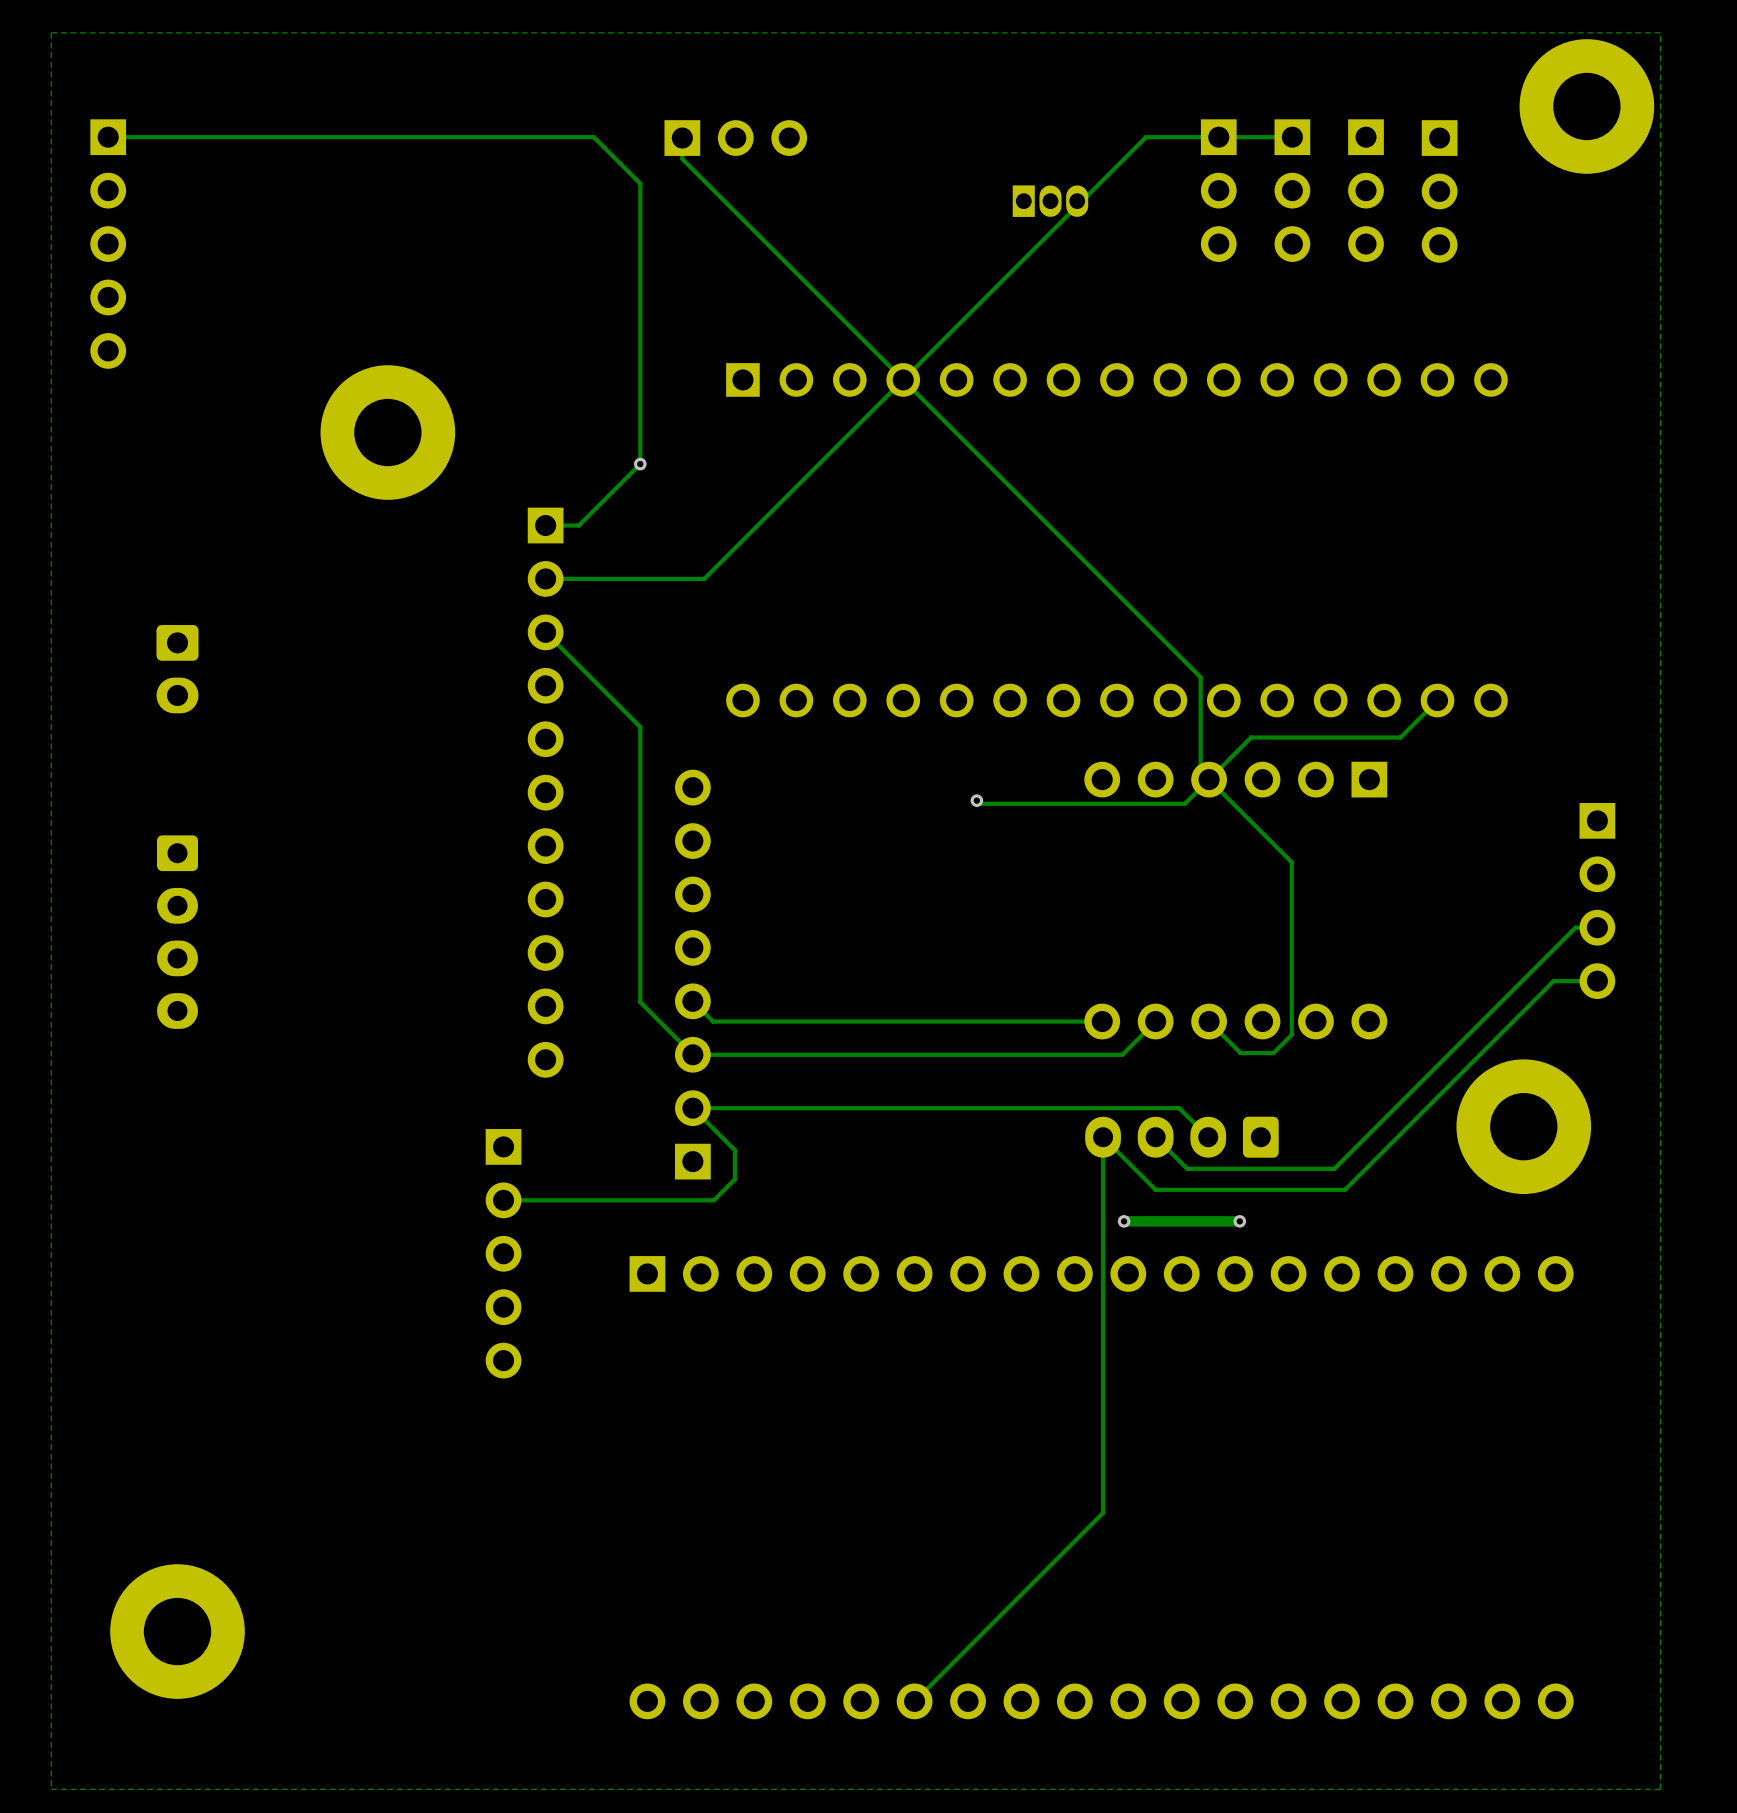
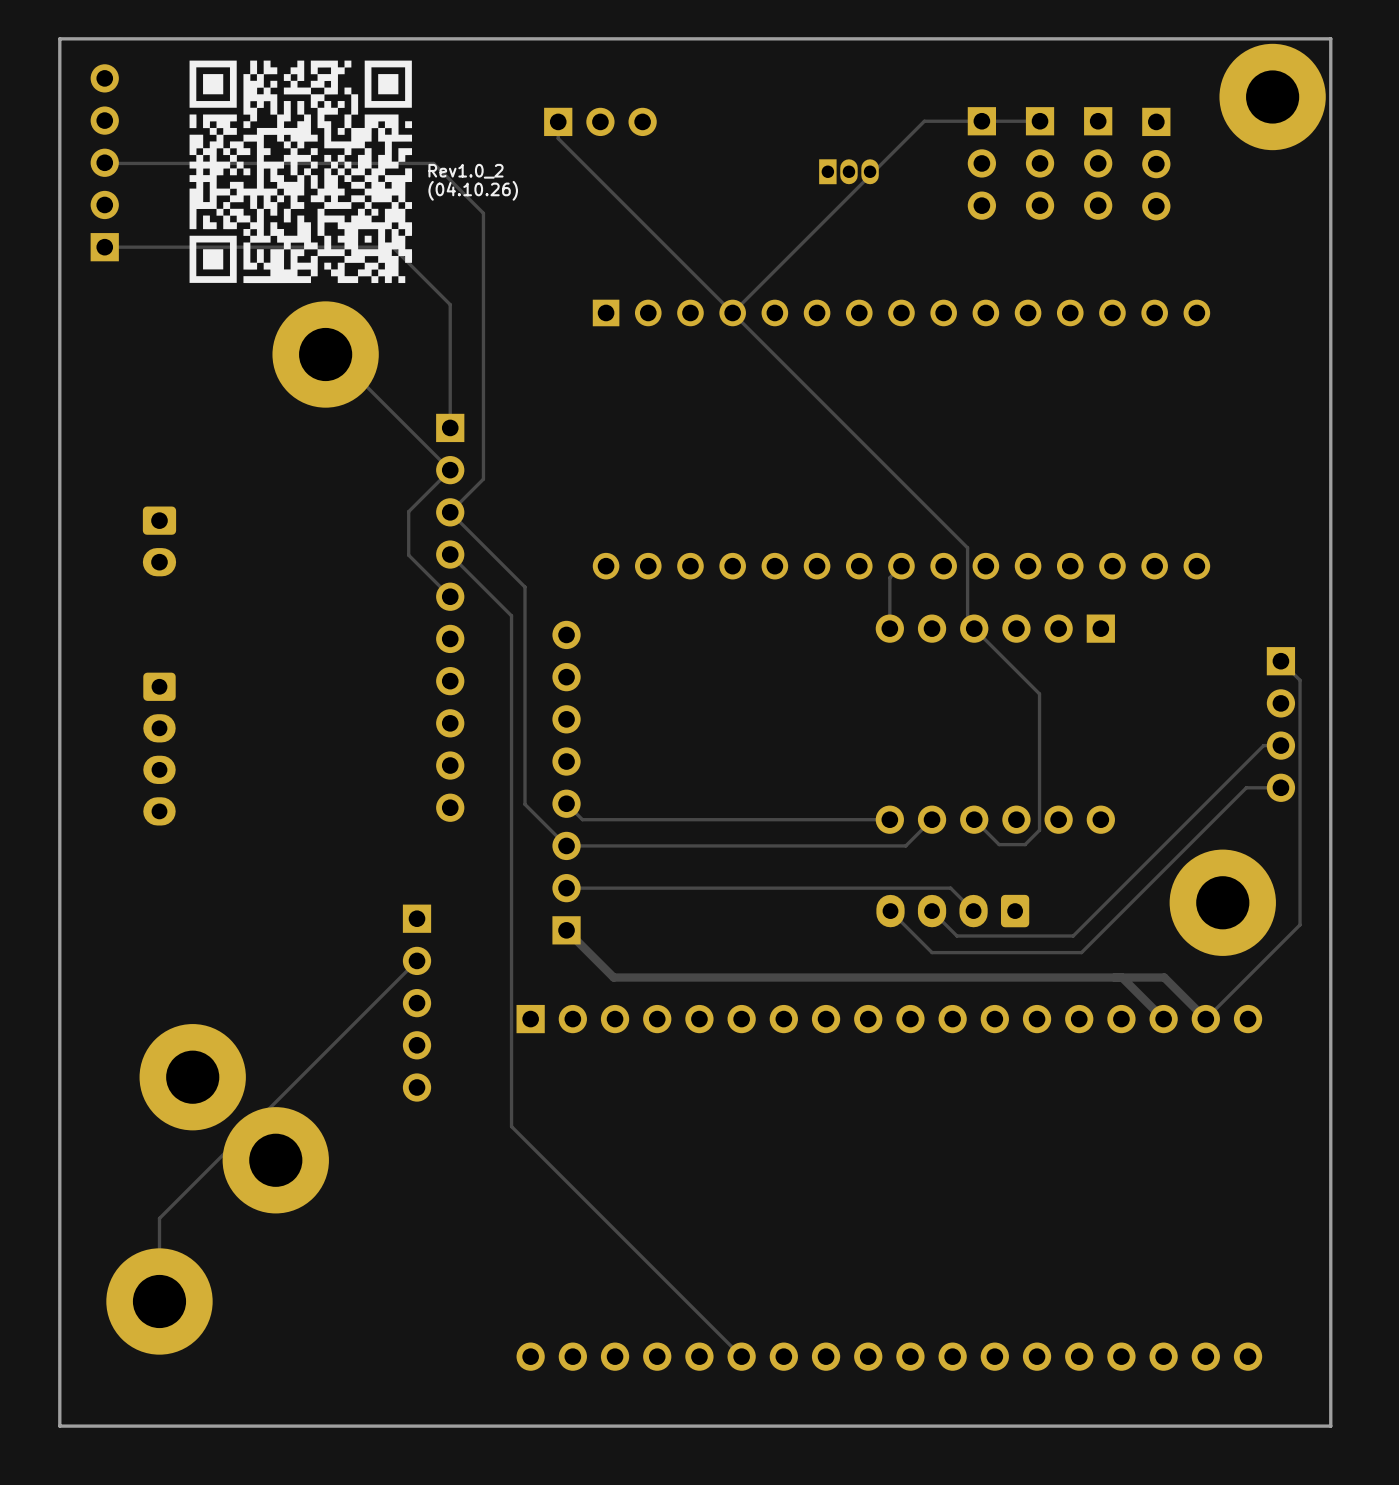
board edge: none -> (1330, 38) (59, 38) (59, 1426) (1330, 1426) (1330, 38)
drawing: none -> [189, 60, 413, 284]
track: (108, 137) (593, 137) (640, 183) (640, 464) (578, 525) (545, 525) -> (104, 247) (392, 247) (450, 304) (450, 427)
track: none -> (104, 162) (433, 163) (483, 213) (483, 479) (450, 512)
text: none -> Rev1.0_2 (466, 171)
text: none -> (04.10.26) (473, 190)
part rotation: 0° (108, 244) -> 180° (104, 162)
track: (903, 379) (704, 578) (545, 578) -> none
track: none -> (325, 354) (334, 354) (450, 470) (408, 511) (408, 555) (450, 596)
via: (640, 464) -> none
track: none -> (901, 566) (889, 577) (889, 628)
track: (1437, 700) (1400, 737) (1251, 737) (1184, 803) (980, 803) (976, 800) -> none
part: none -> (450, 617)
part: (545, 792) -> none
via: (976, 800) -> none
track: none -> (1280, 661) (1300, 680) (1300, 924) (1205, 1019) (1164, 977) (998, 977)
track: (692, 1108) (734, 1150) (734, 1179) (713, 1200) (503, 1200) -> (159, 1301) (159, 1218) (417, 960)
track: (1103, 1137) (1103, 1512) (914, 1701) -> (450, 554) (511, 615) (511, 1126) (741, 1356)
track: none -> (566, 930) (613, 977) (907, 977)
via: (1124, 1221) -> none
via: (1239, 1221) -> none
track: none -> (1122, 977) (1163, 1019)
part: none -> (192, 1077)
part: none -> (275, 1160)

